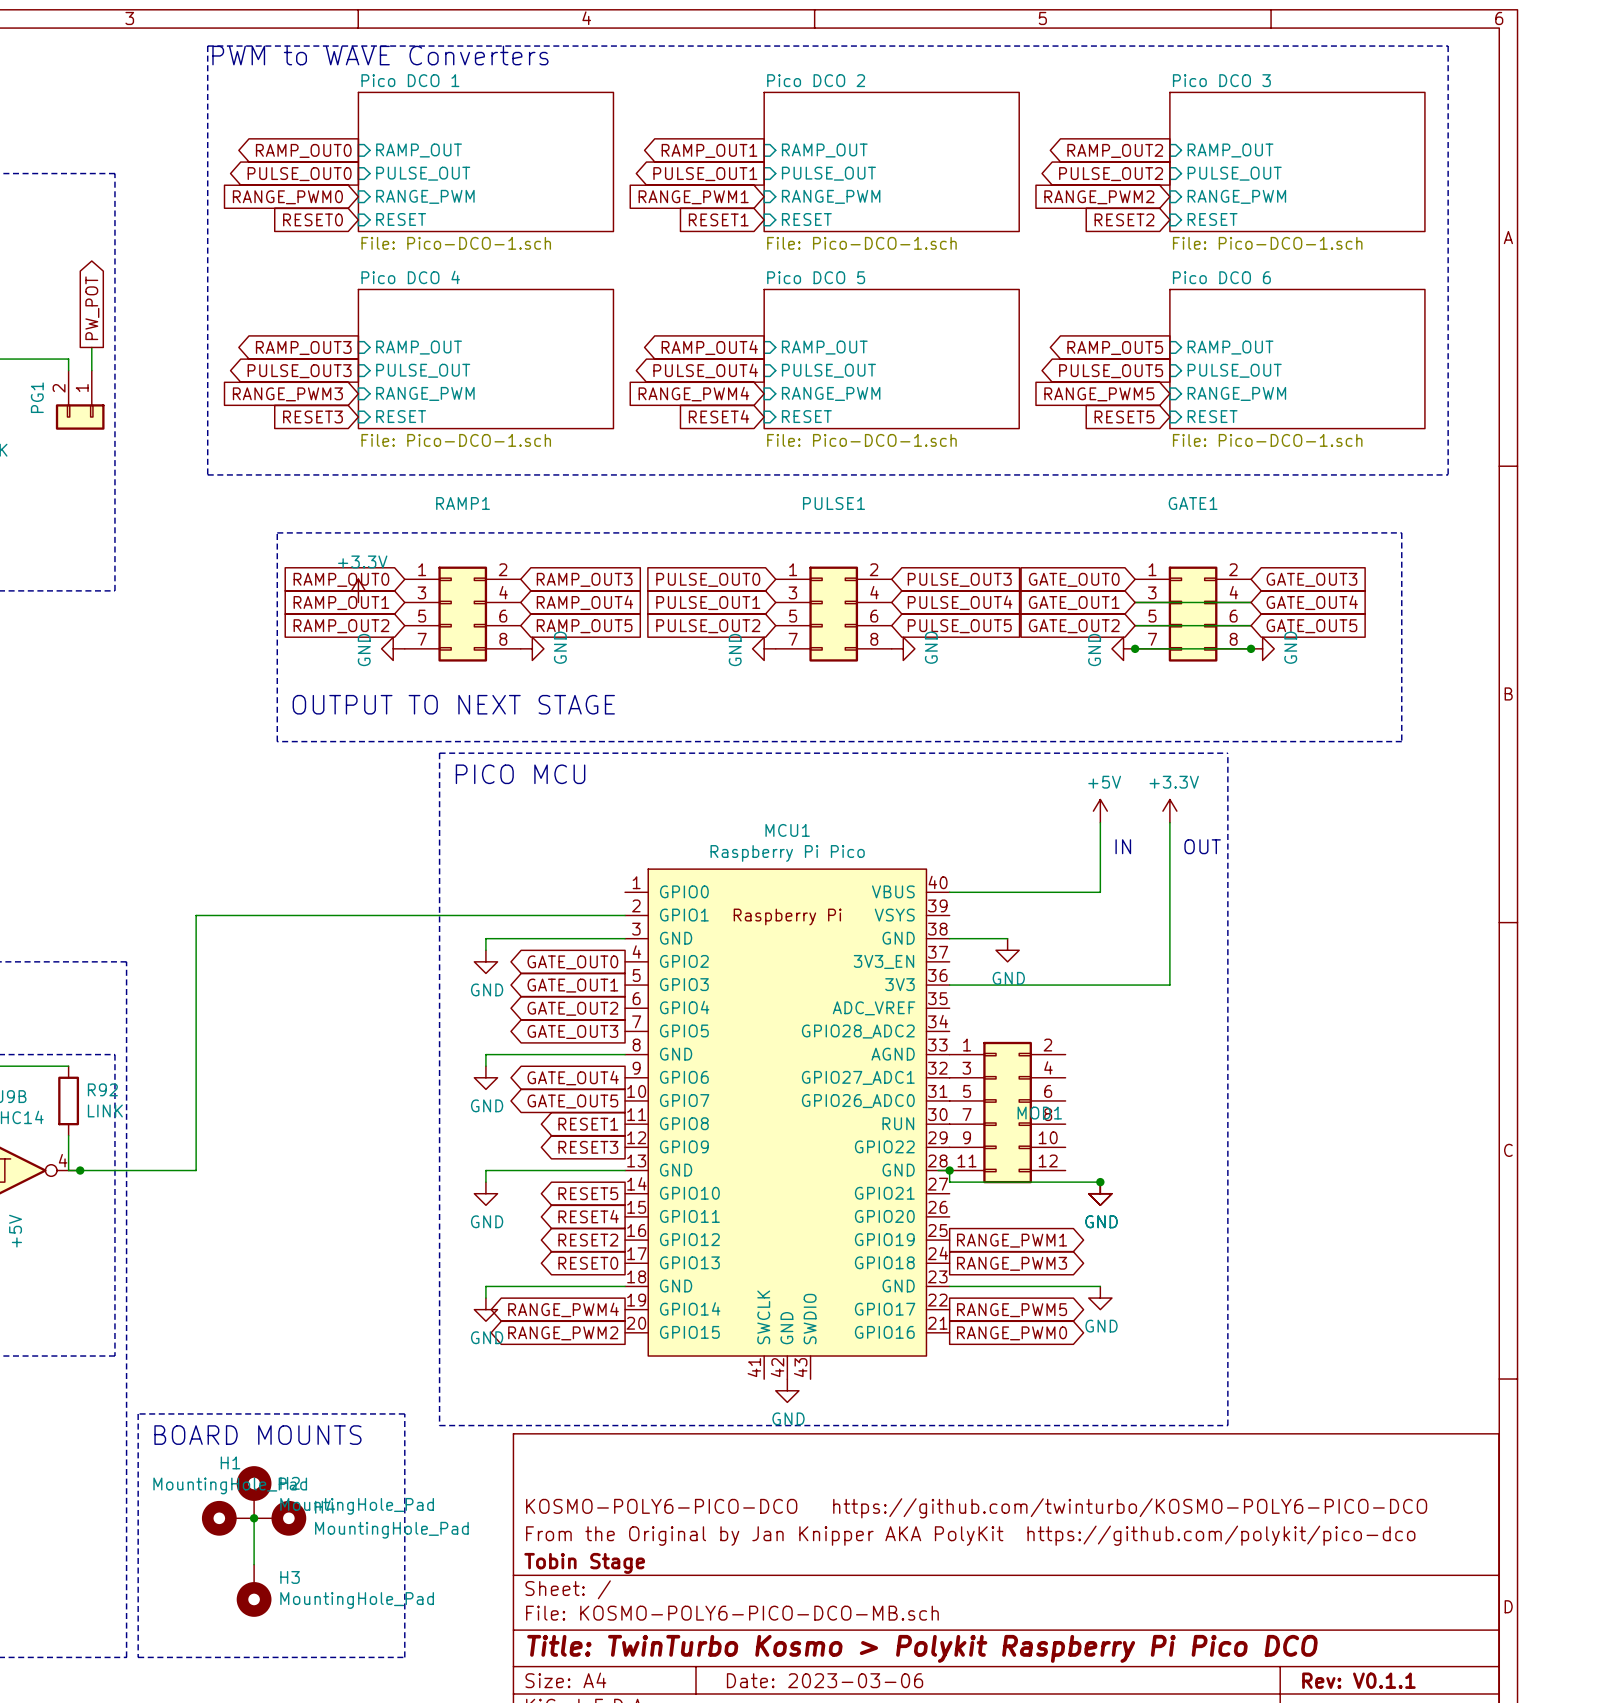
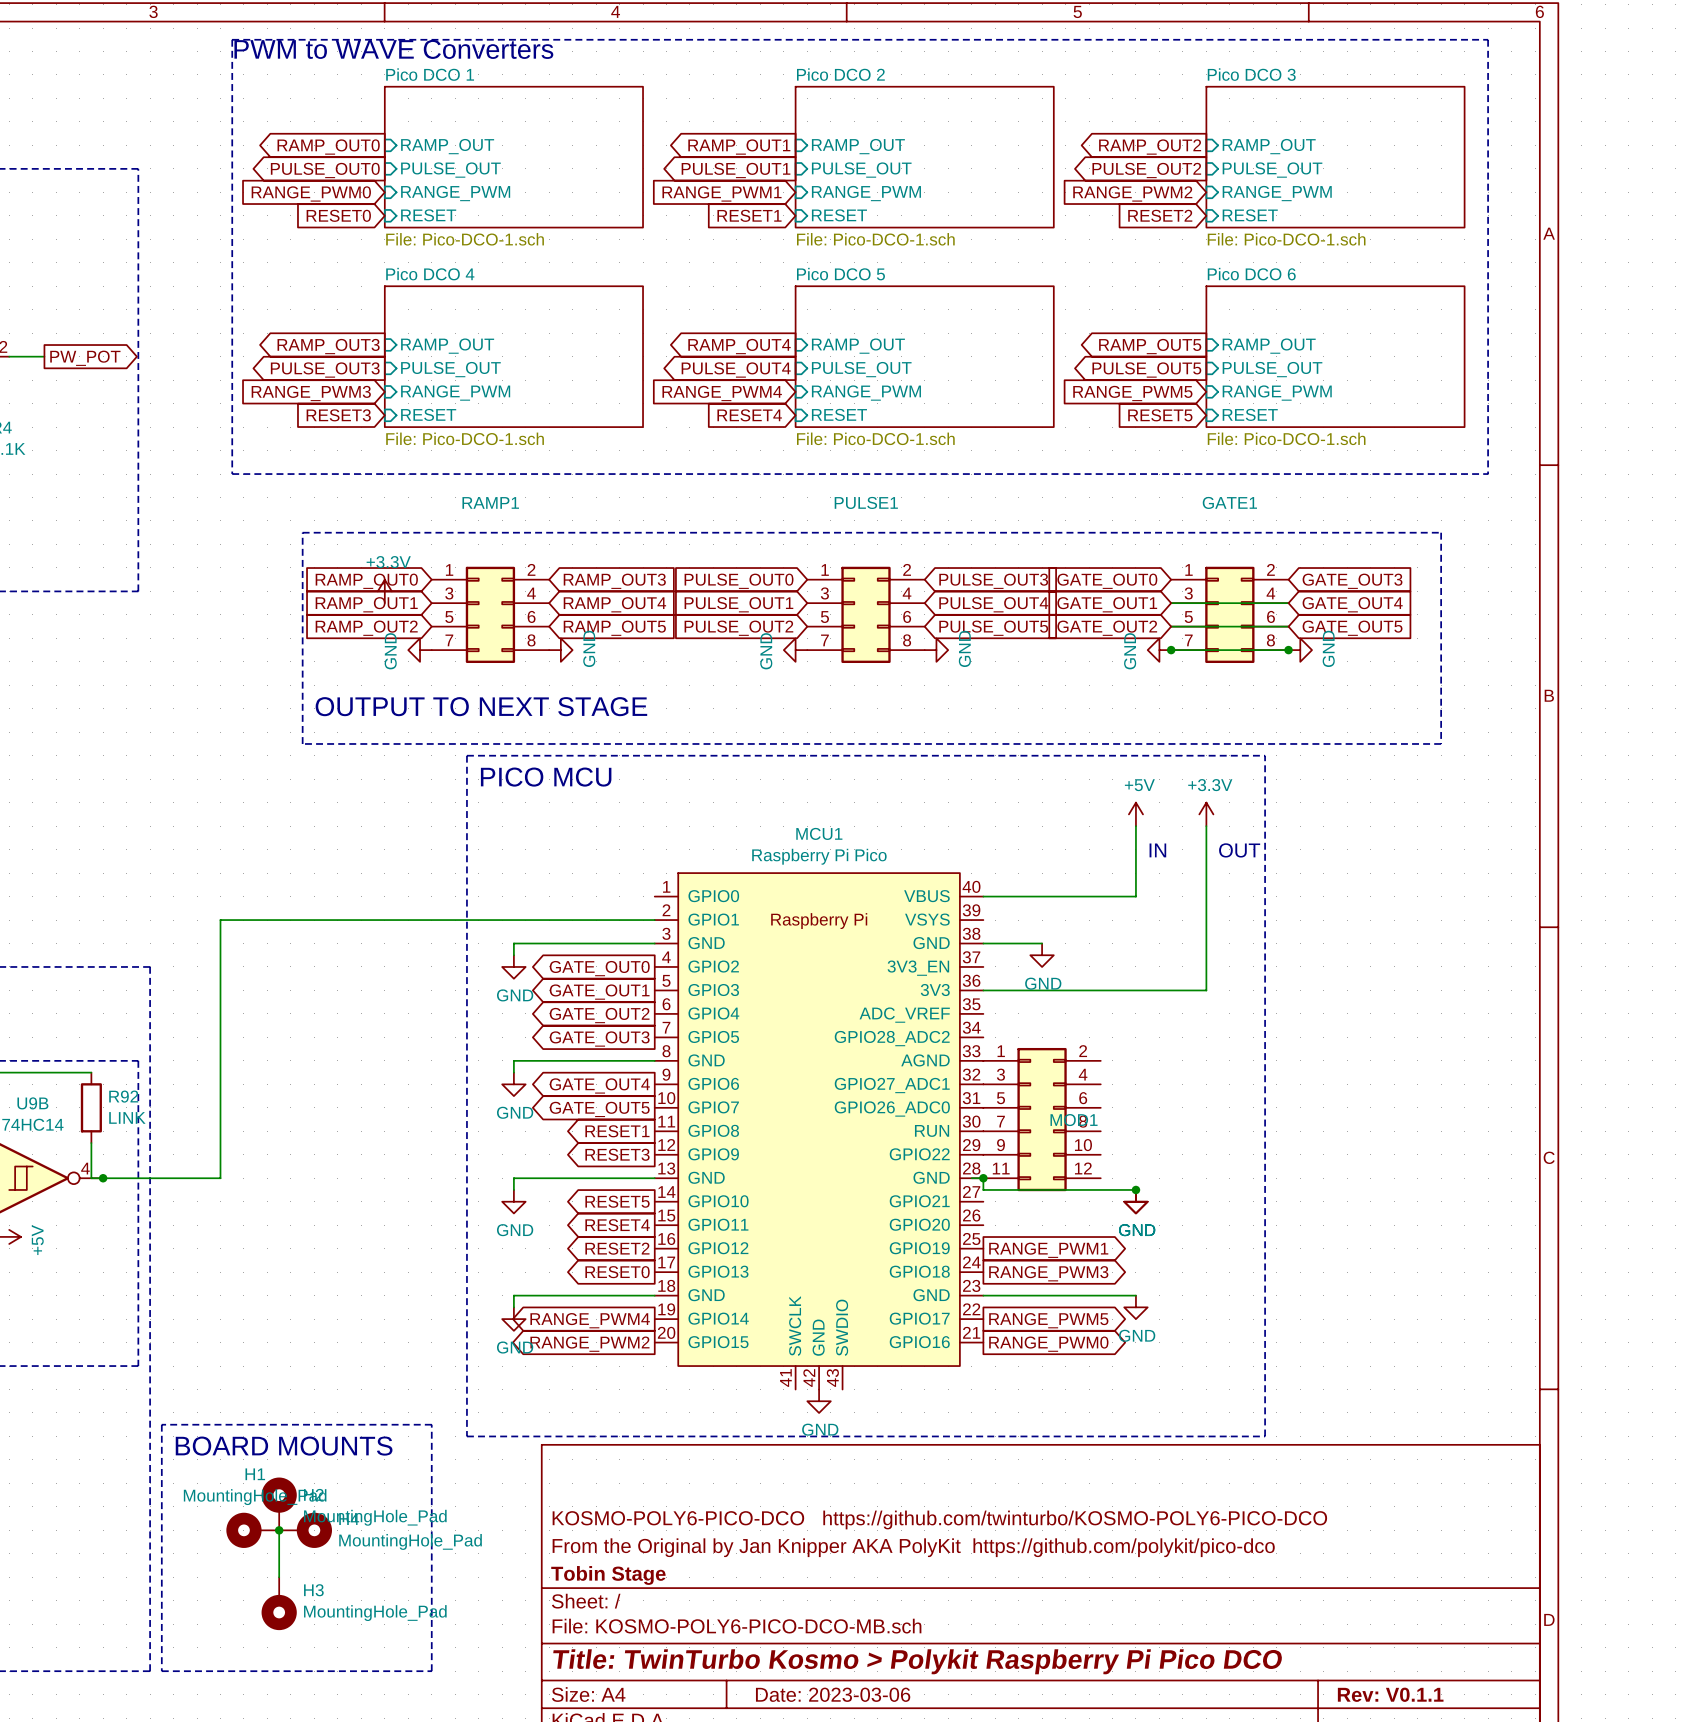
global label rotation: 0° (92, 308) -> 90° clockwise (85, 358)
wire: (91, 347) (91, 370) -> none
wire: (22, 359) (68, 359) (68, 370) -> none
PG1: (80, 400) -> none

